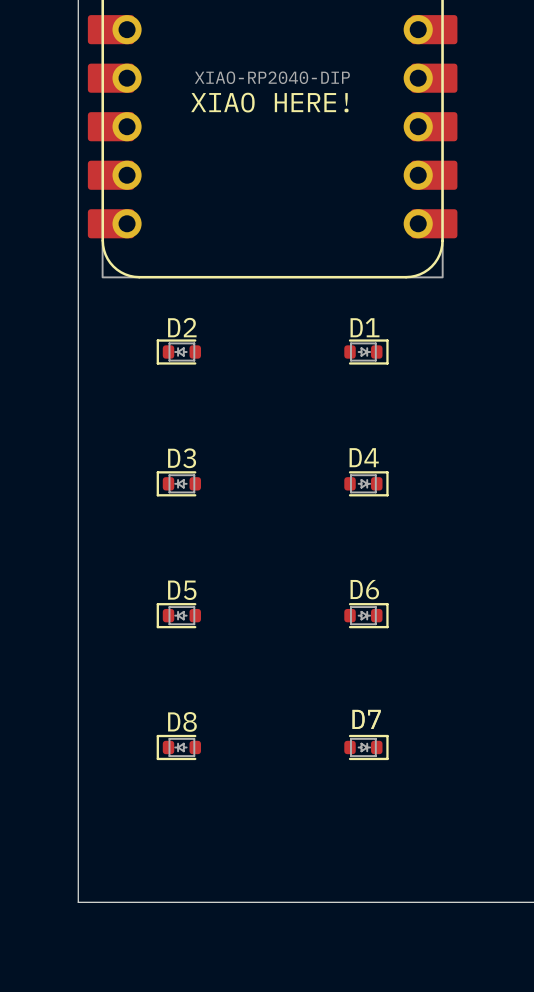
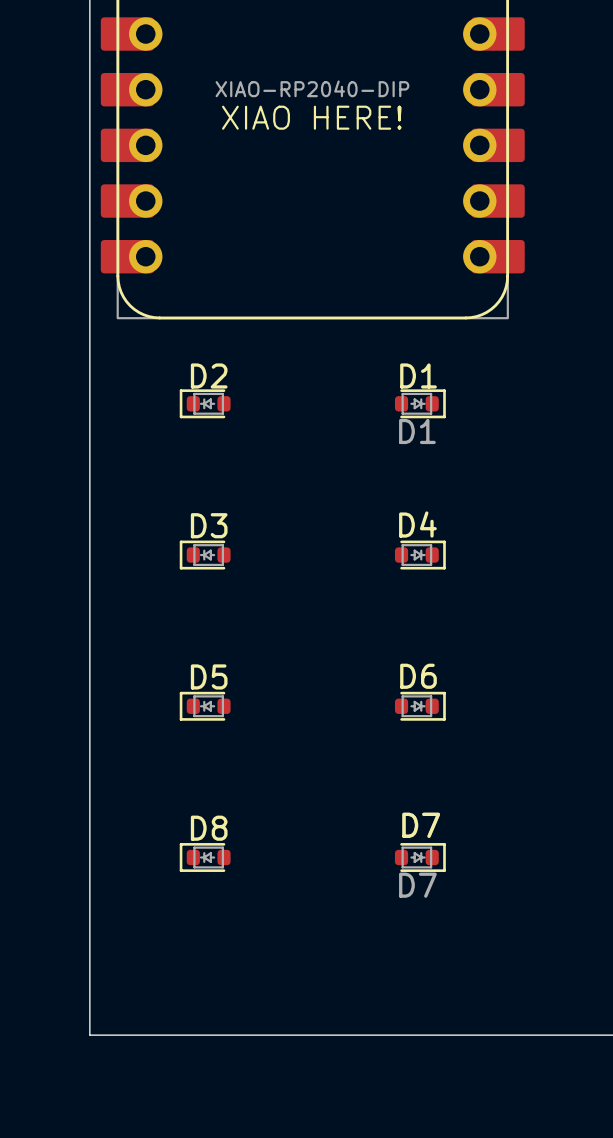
D1 name: none -> D1 (417, 431)
D7 name: none -> D7 (417, 885)

